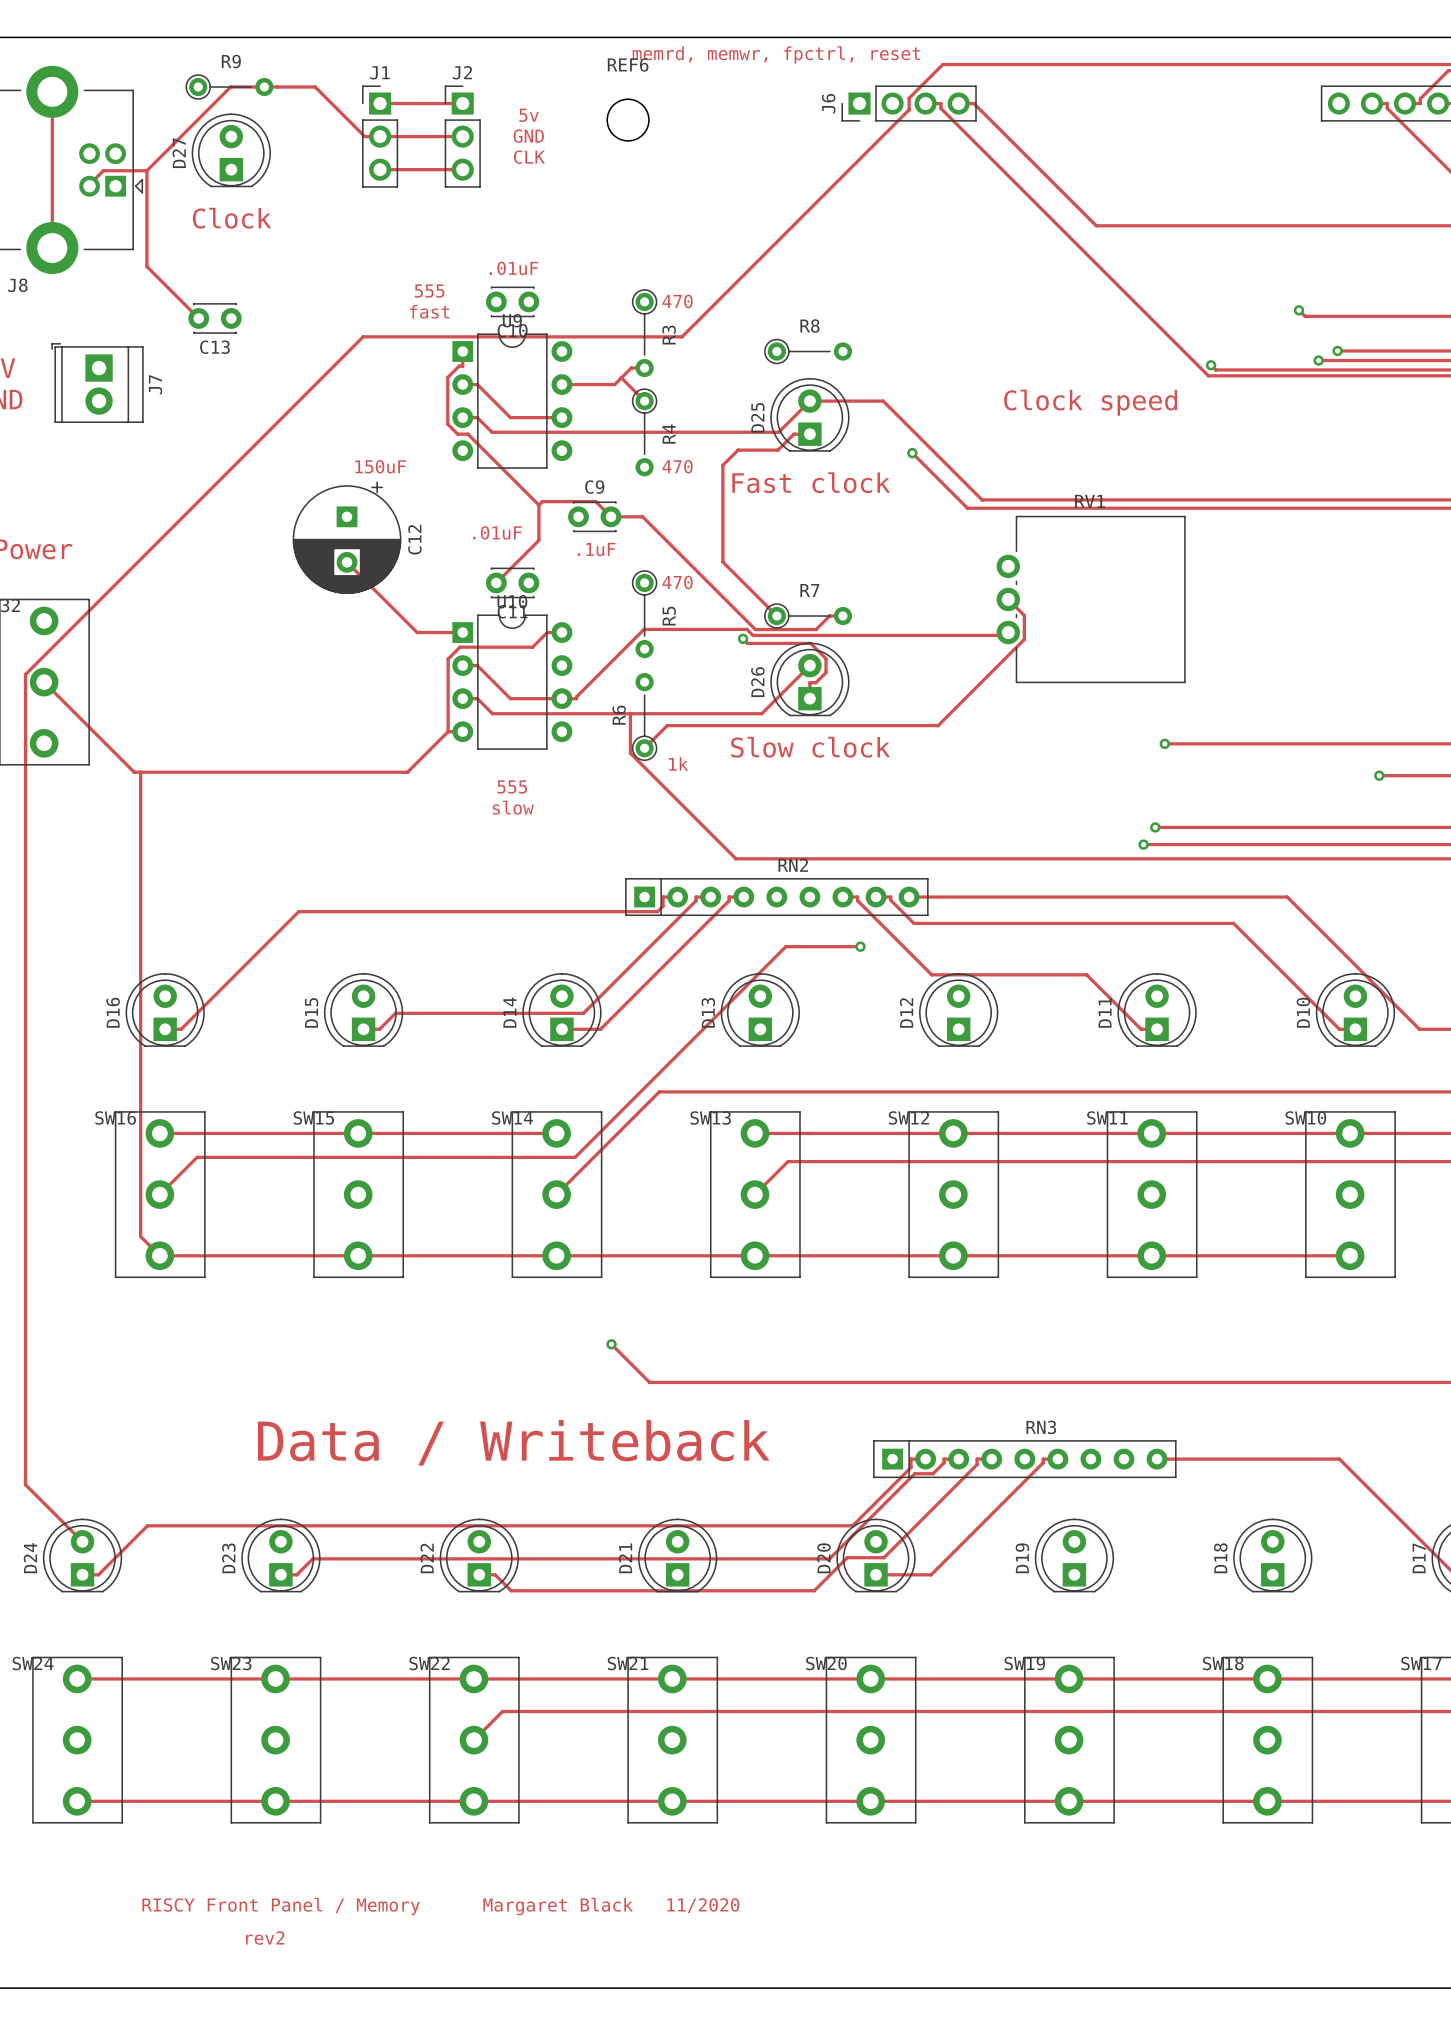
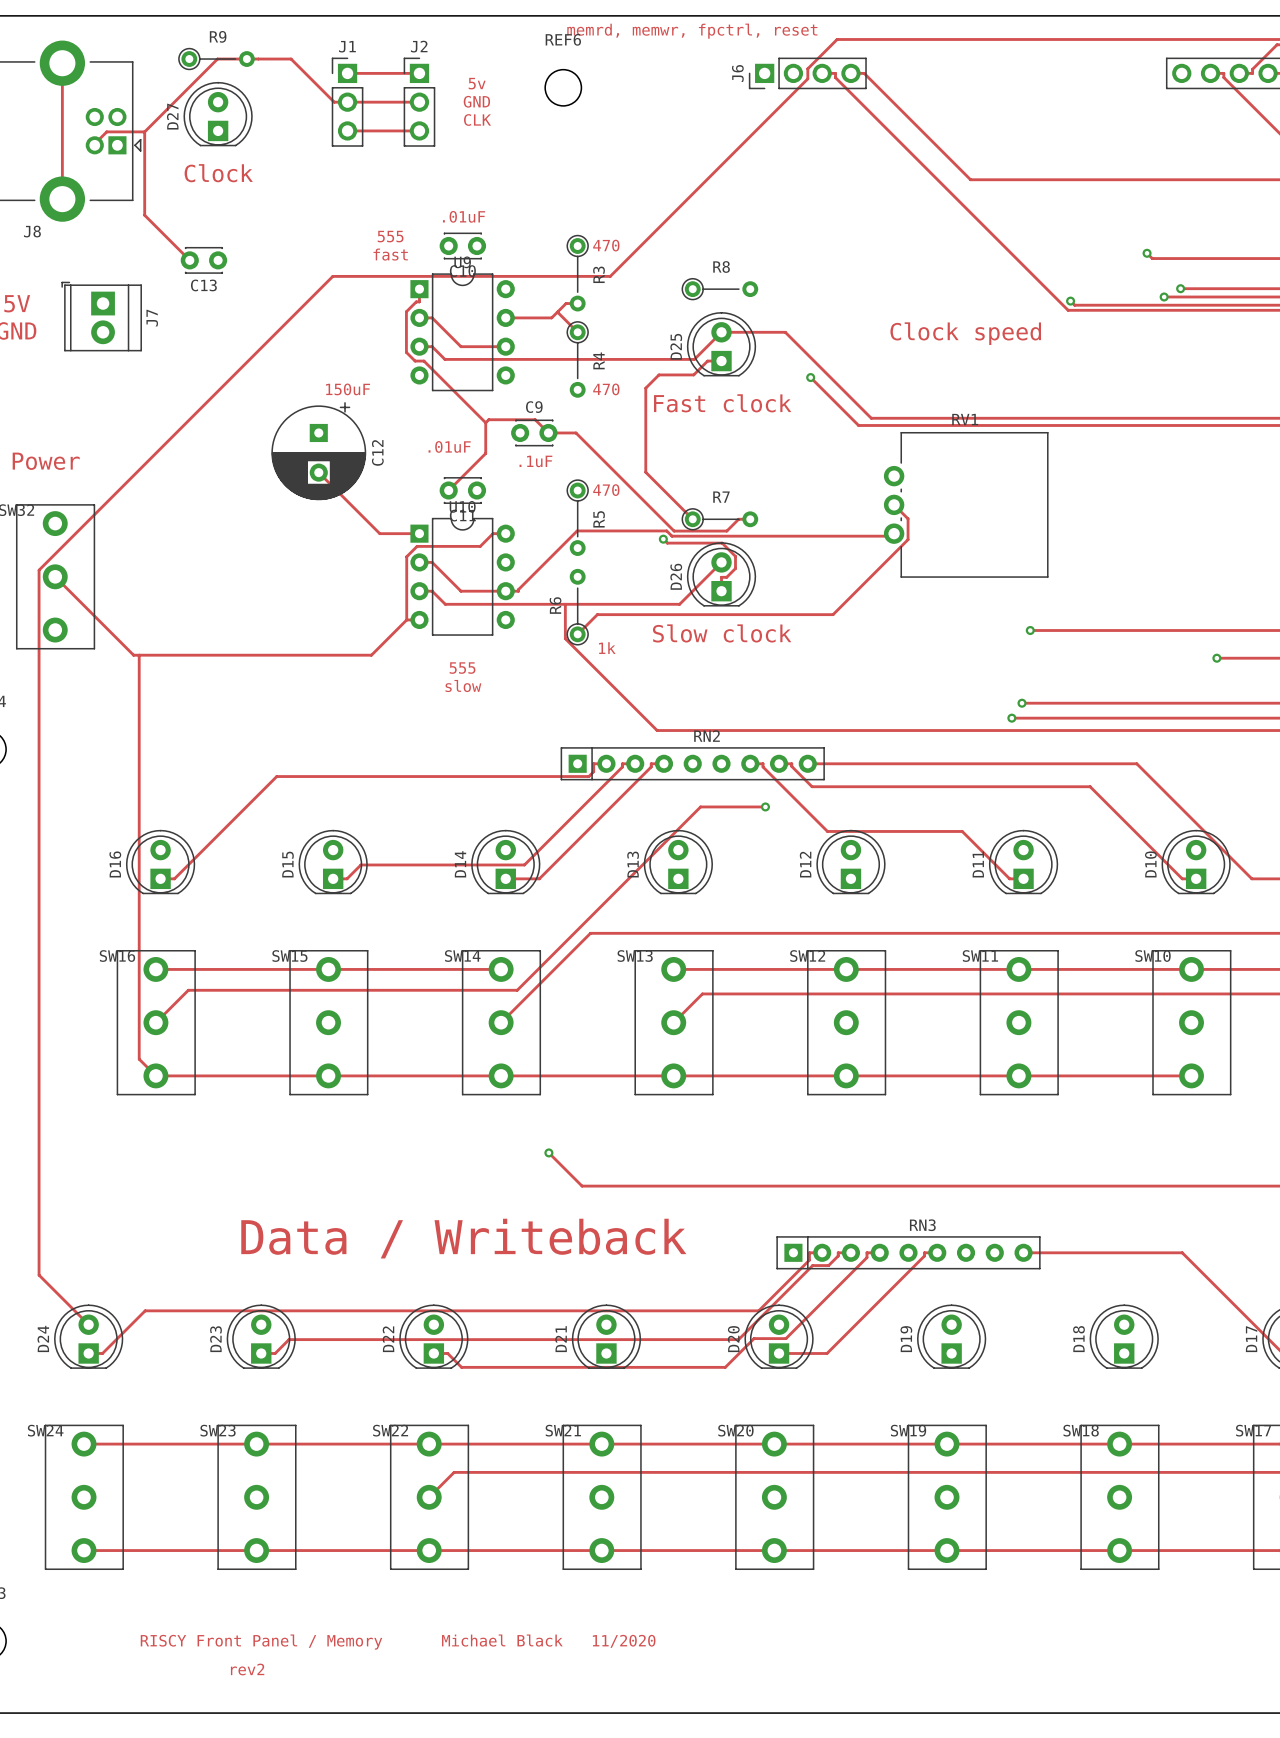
text: Margaret Black 11/2020 (611, 1906) -> Michael Black 11/2020 (548, 1641)

